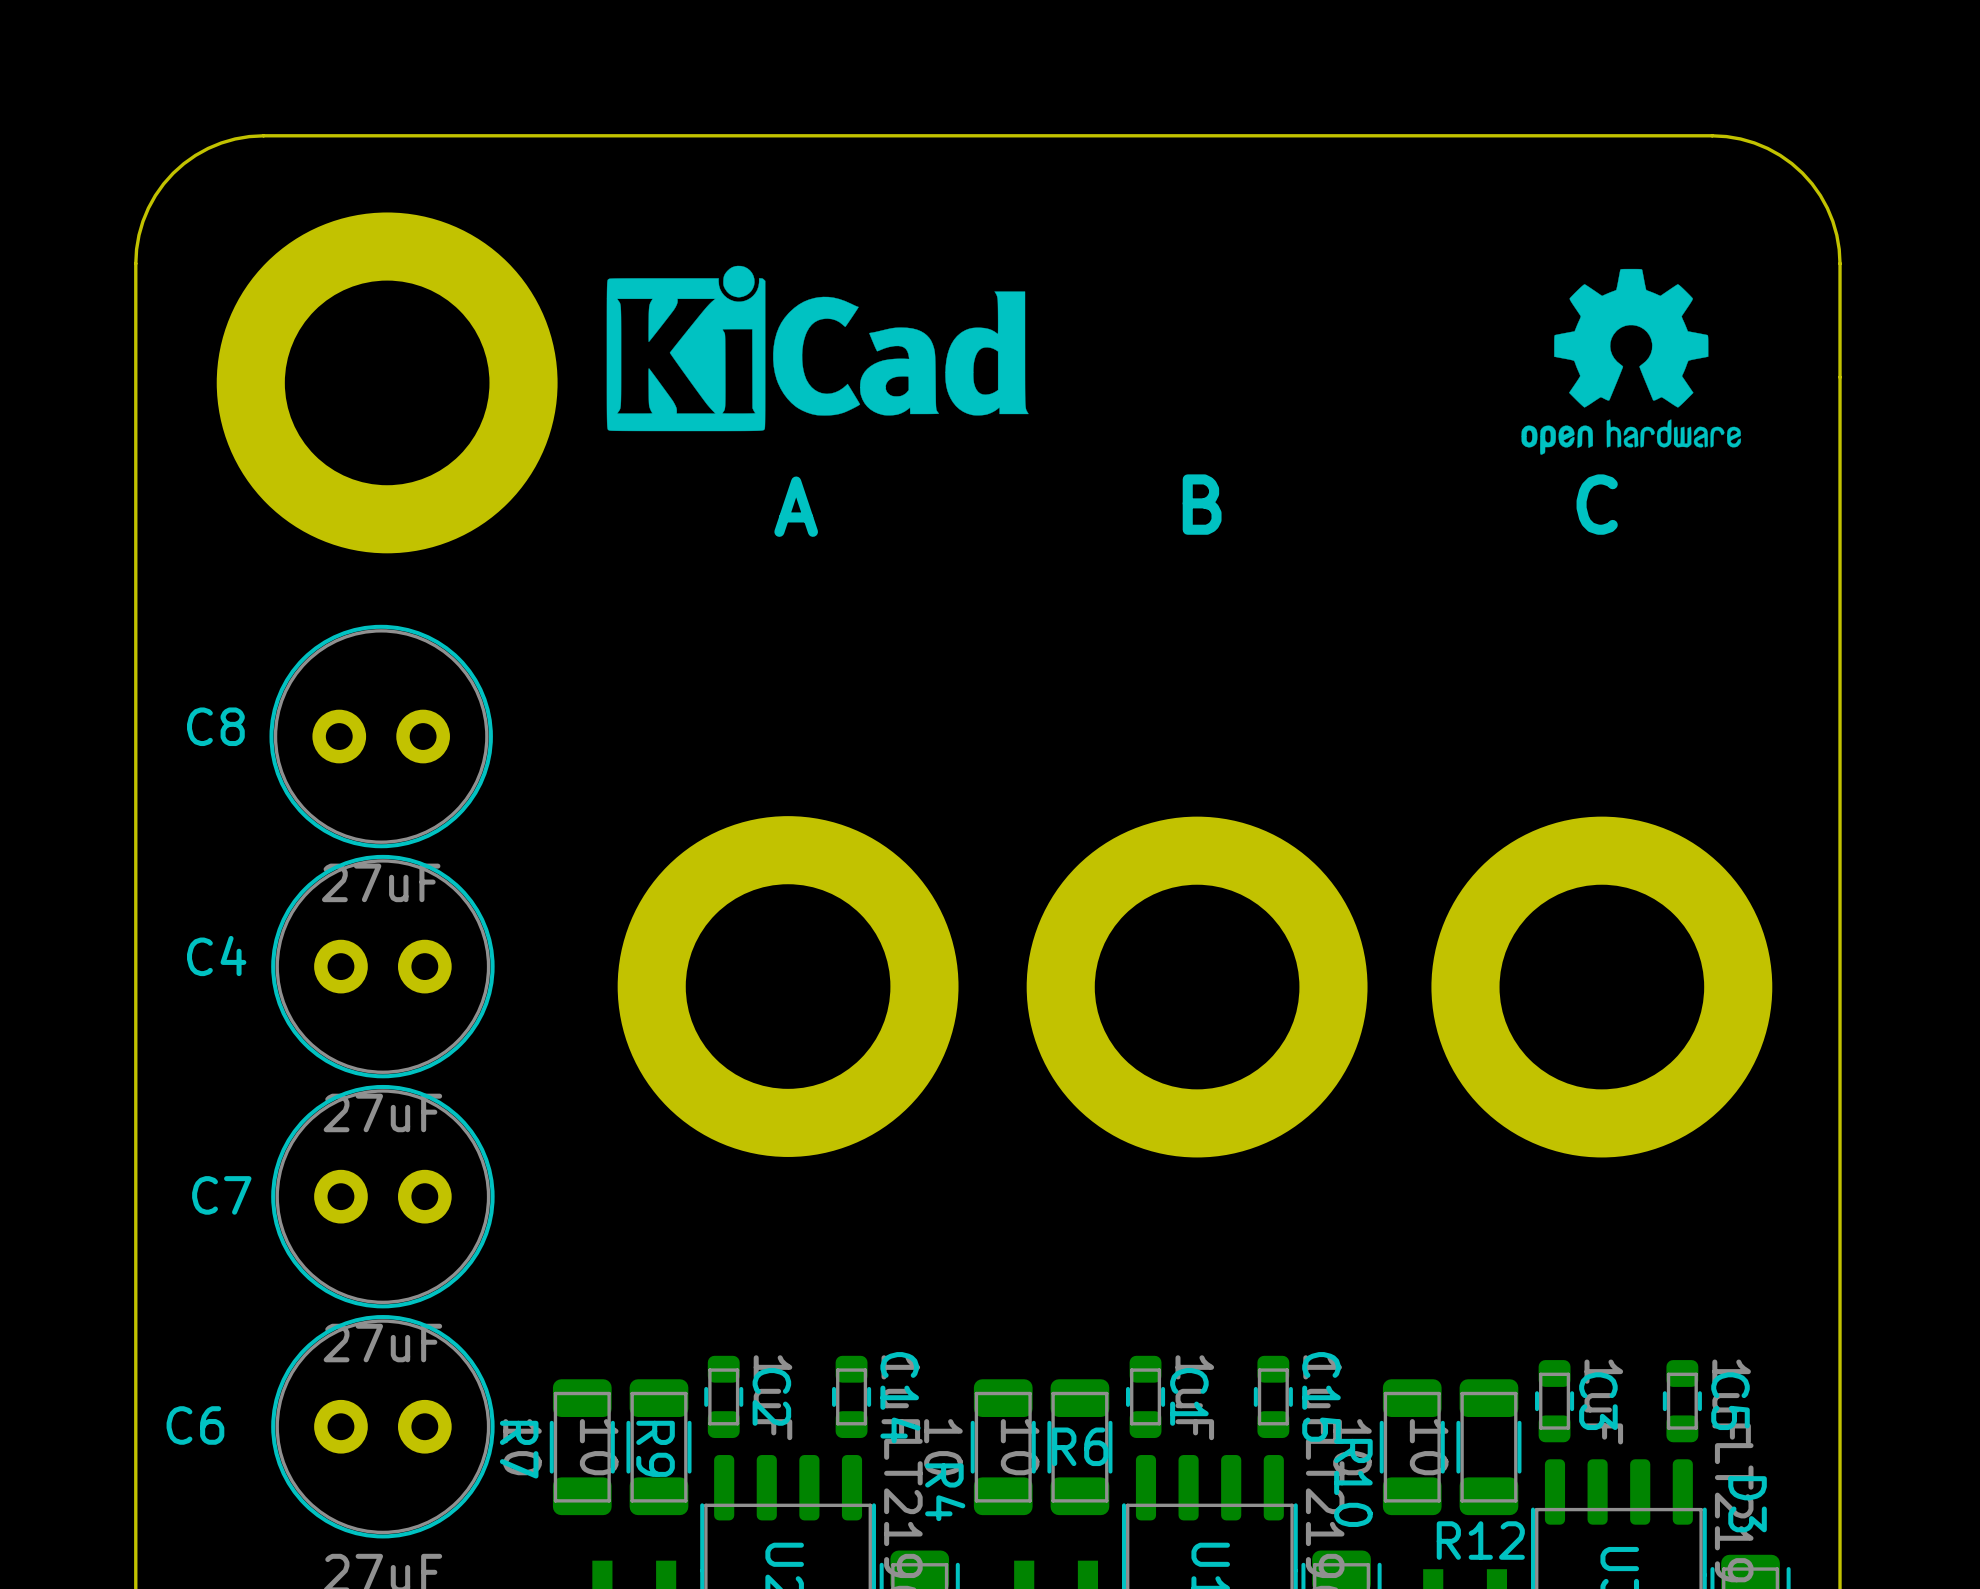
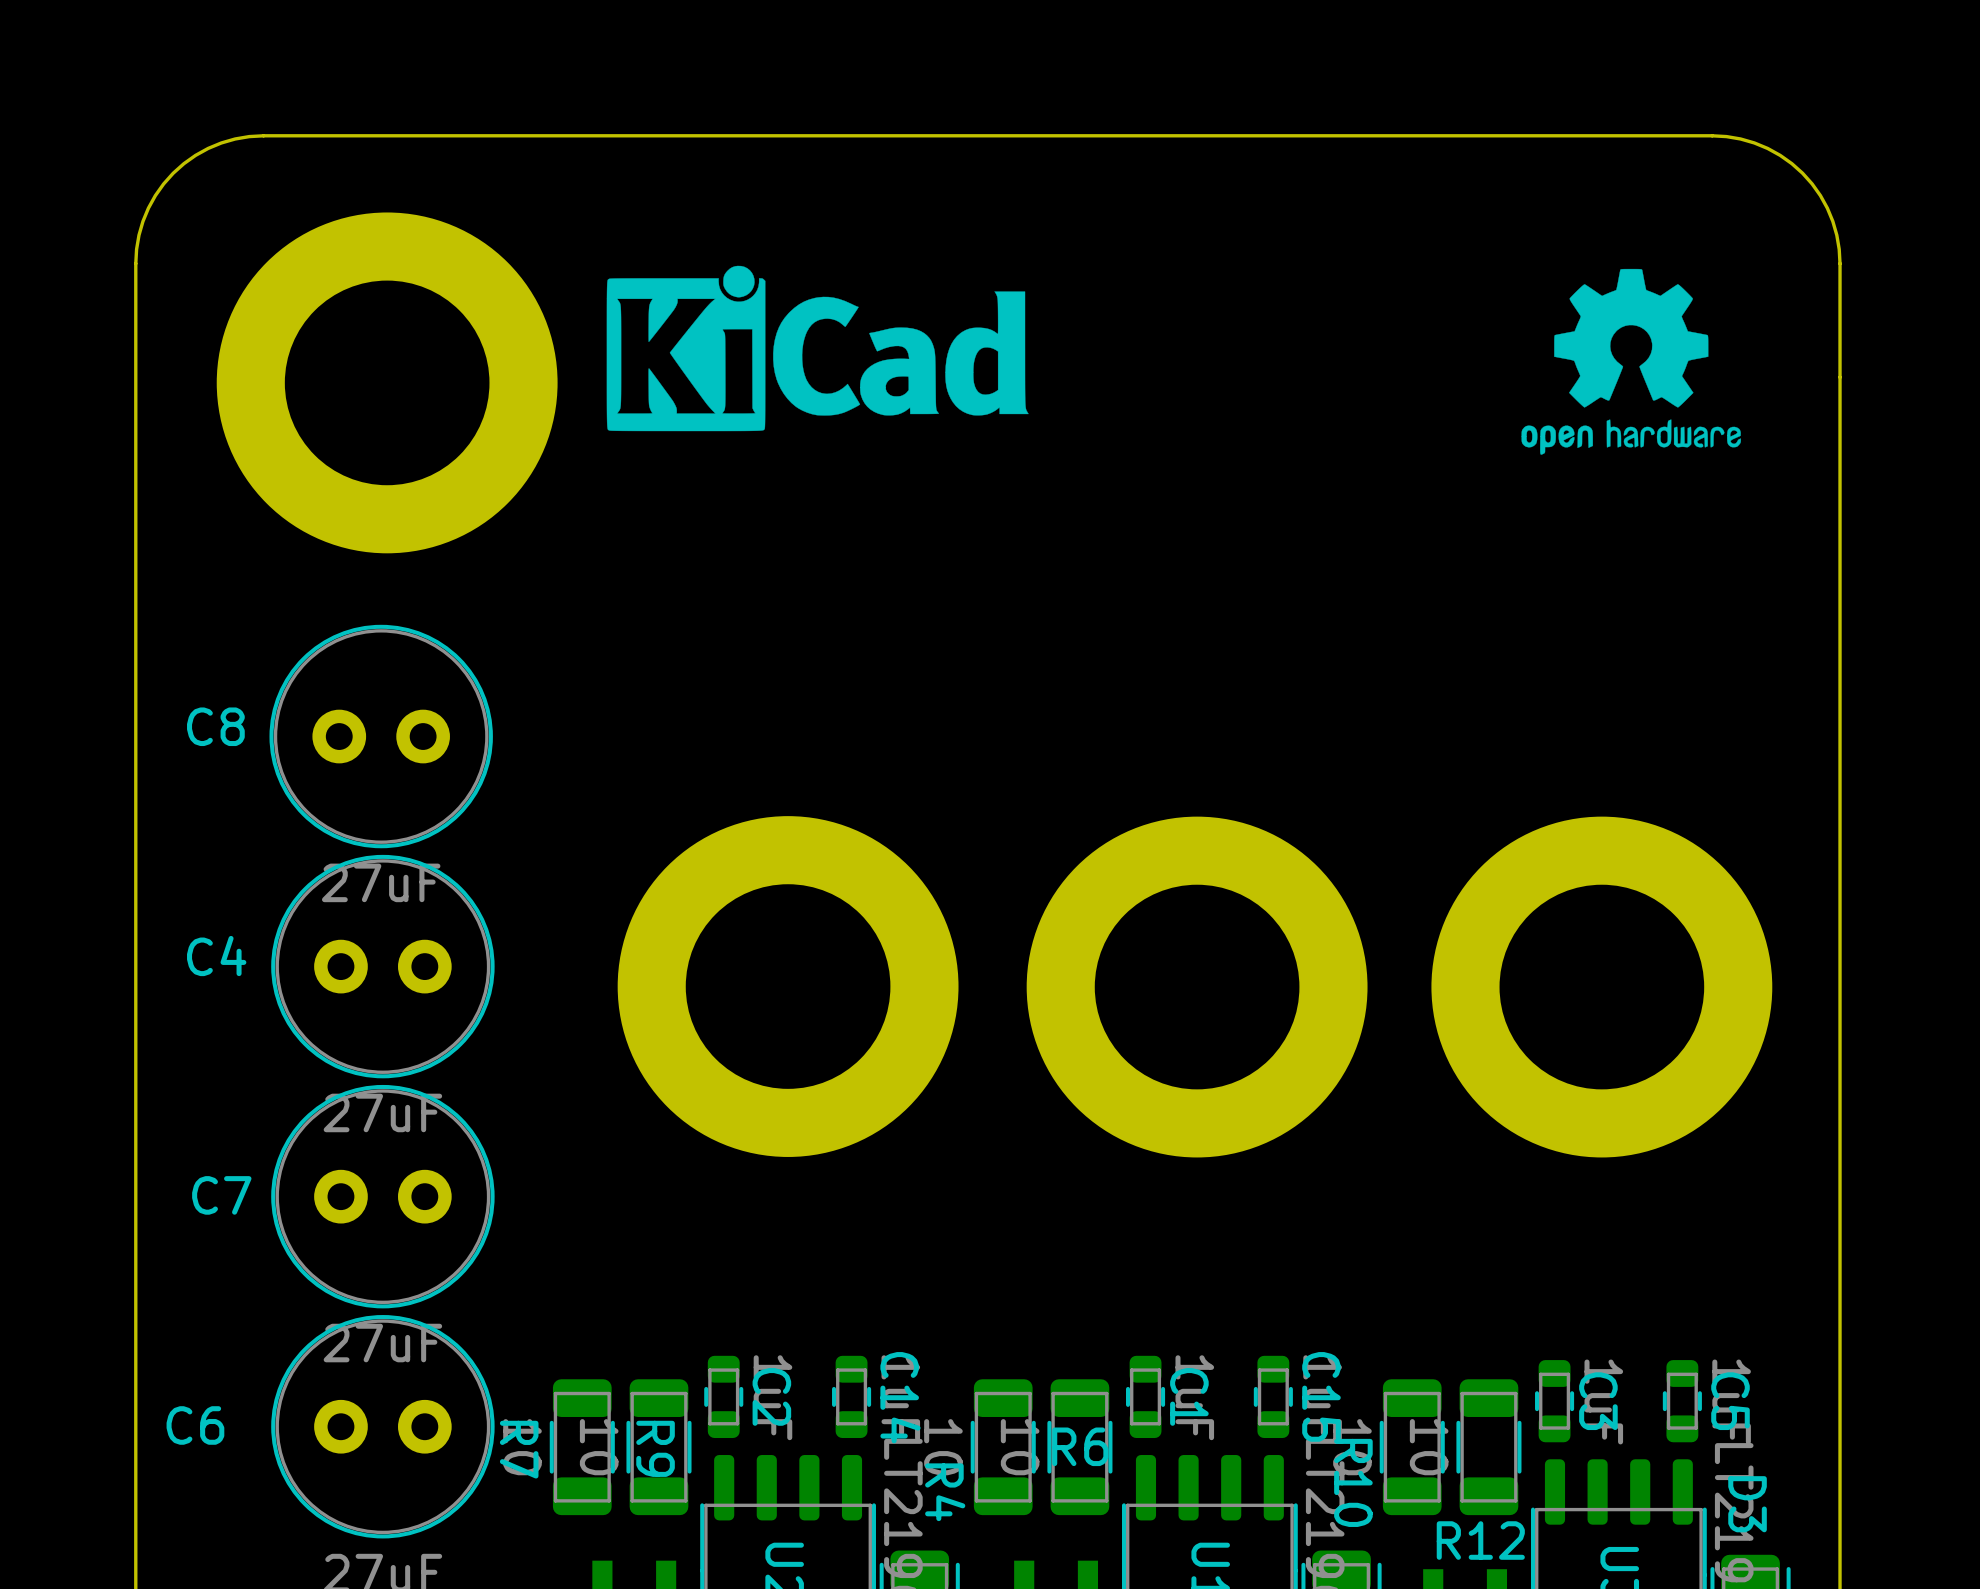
text: B (1202, 504) -> none
text: C (1597, 504) -> none
text: A (796, 506) -> none

